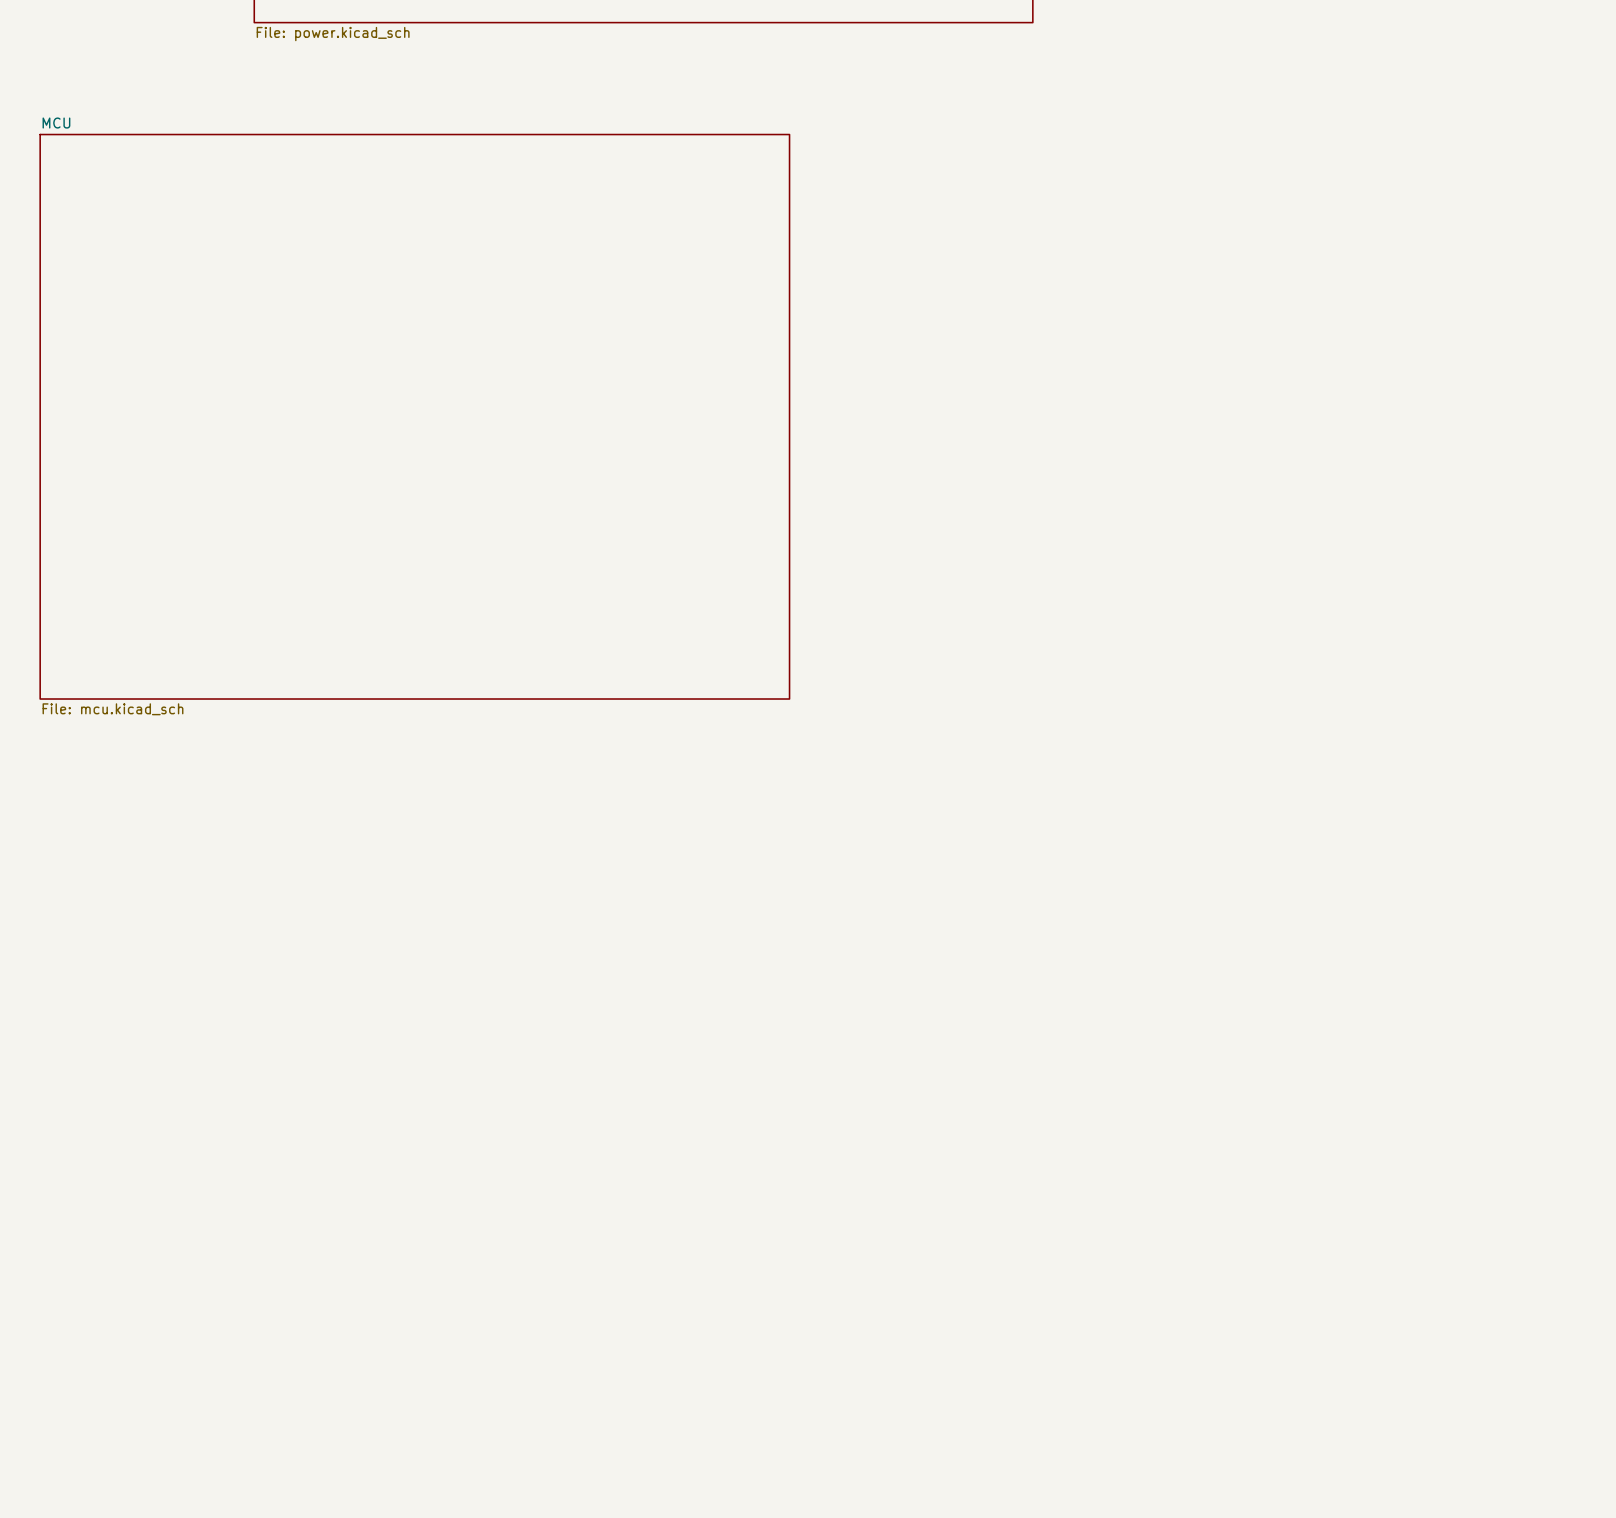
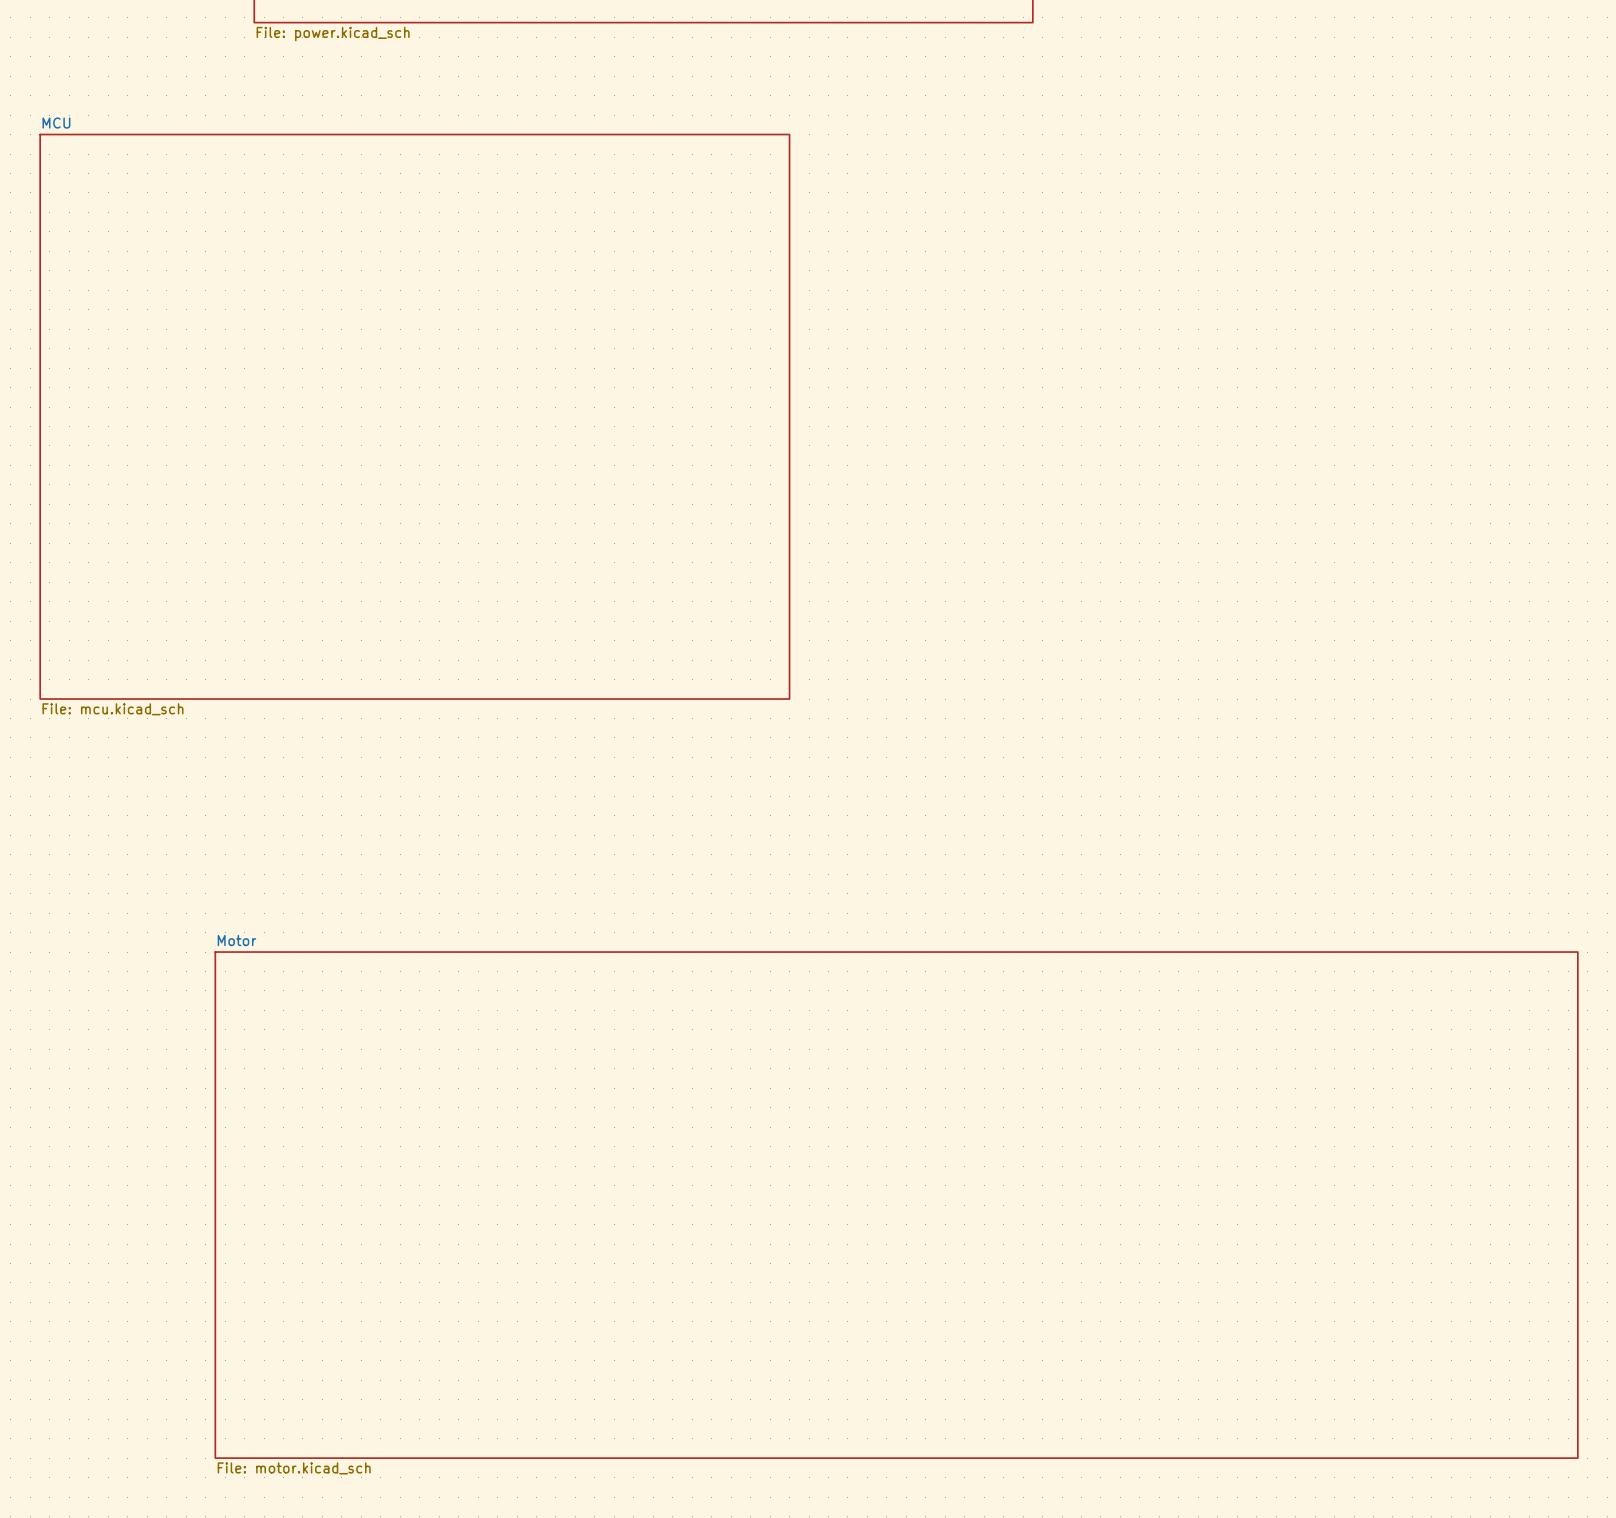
sheet Motor: none -> File: motor.kicad_sch (896, 1205)

